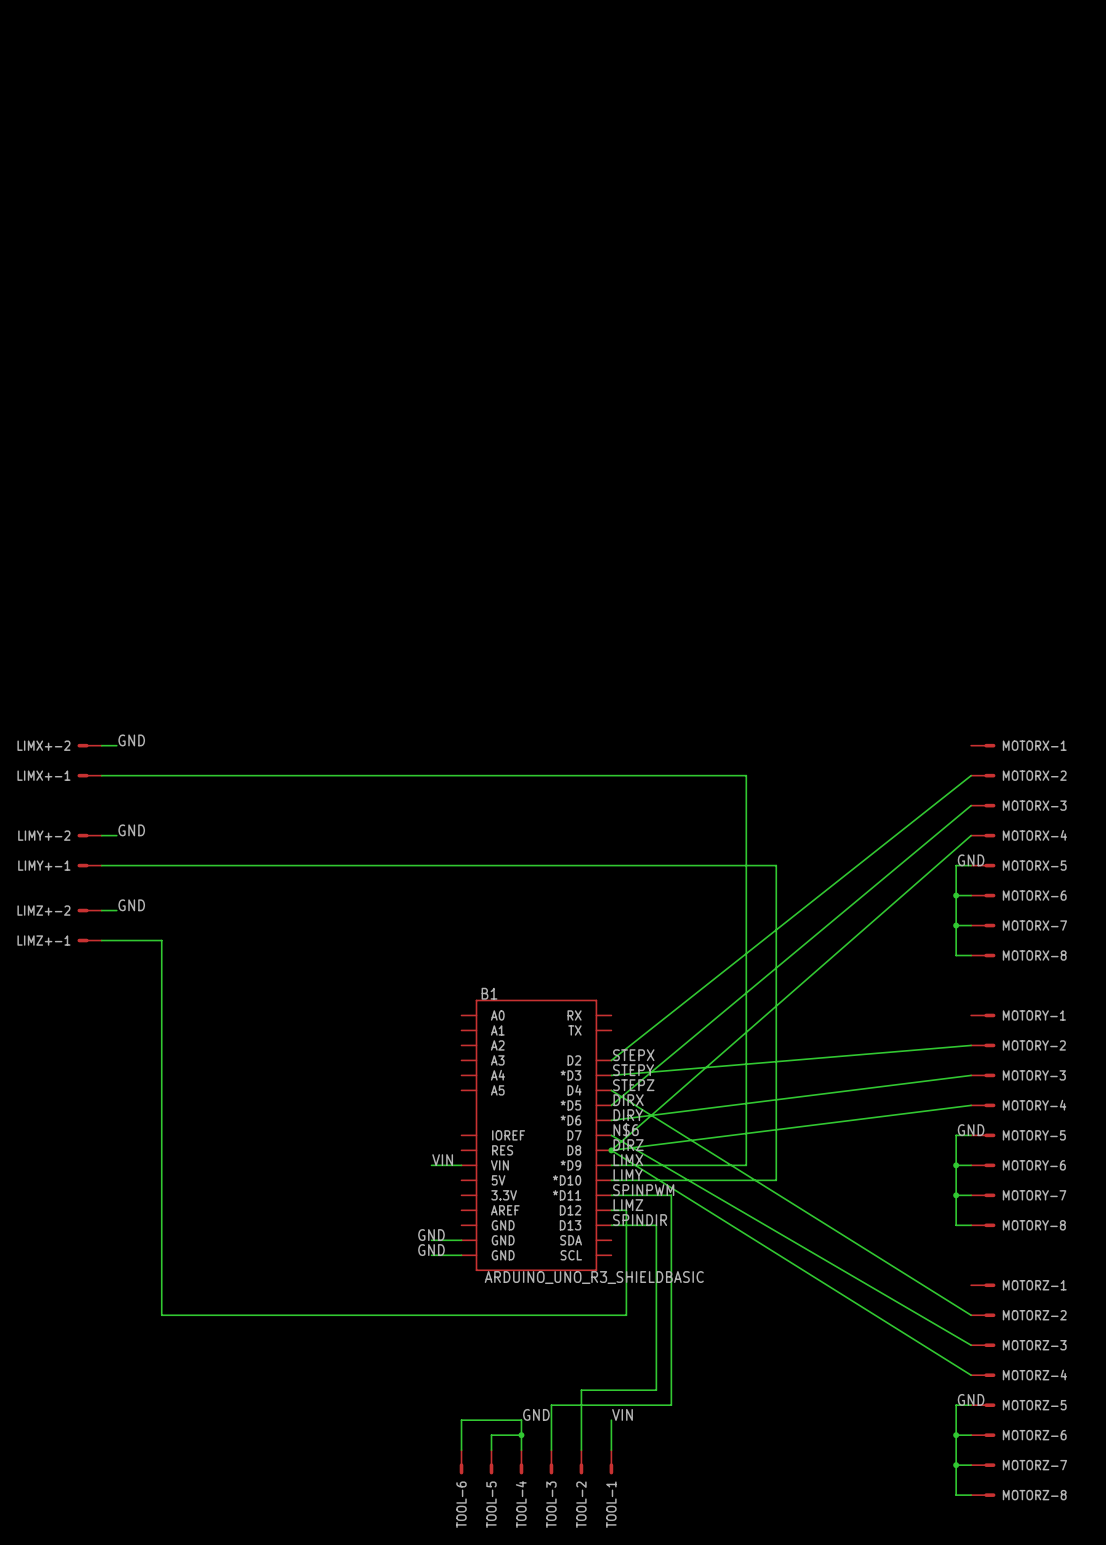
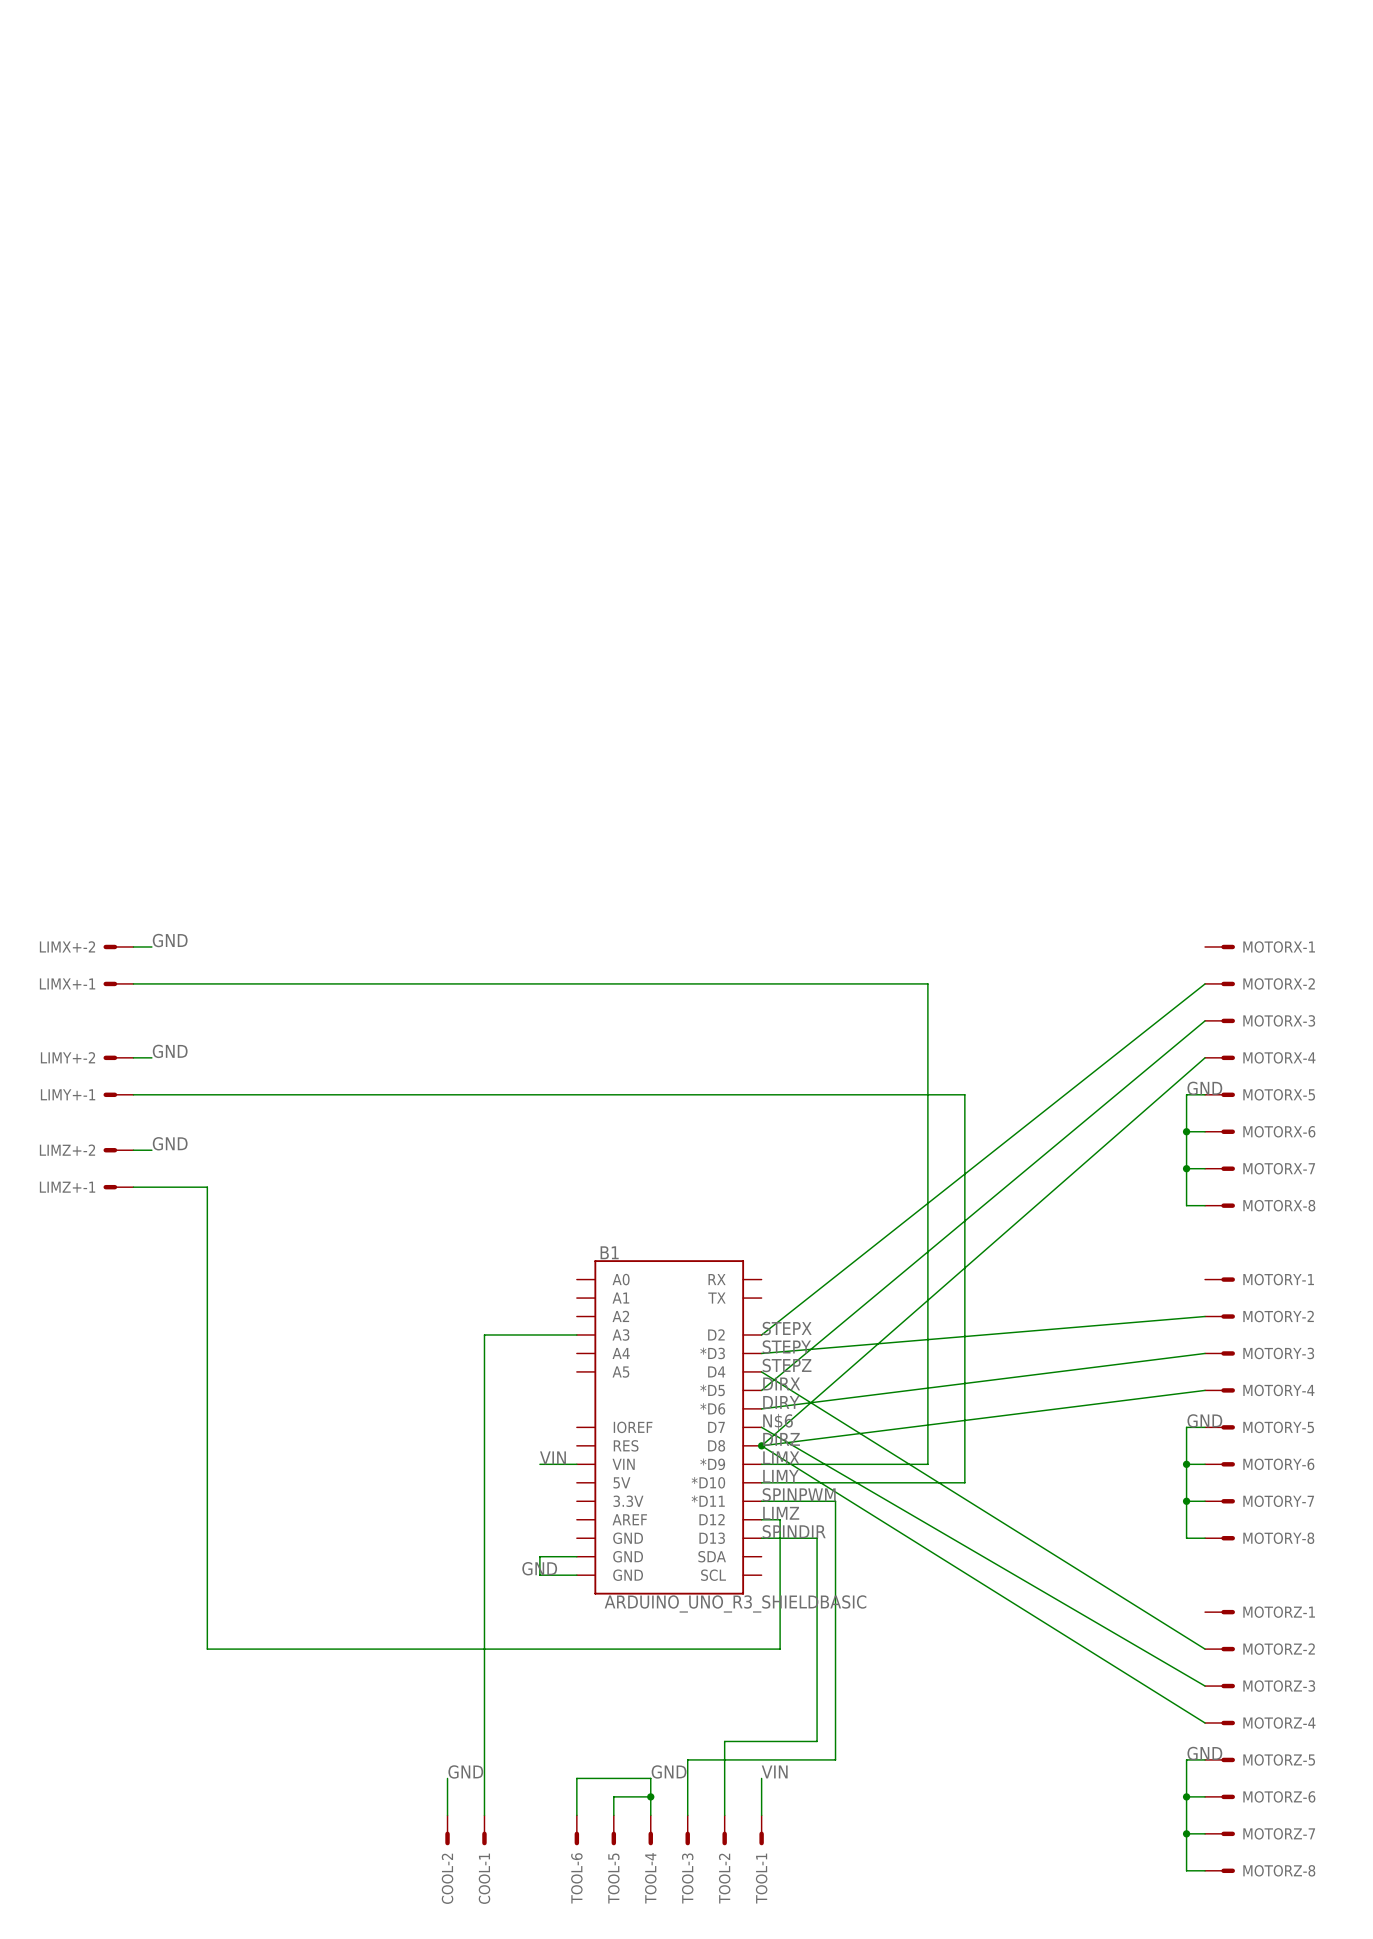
wire: none -> (576, 1334) (484, 1334) (484, 1815)
label: GND (431, 1235) -> none
wire: none -> (539, 1556) (539, 1575)
label: none -> GND (465, 1771)
wire: none -> (447, 1778) (447, 1815)
COOL-2: none -> (447, 1830)
COOL-1: none -> (484, 1830)

